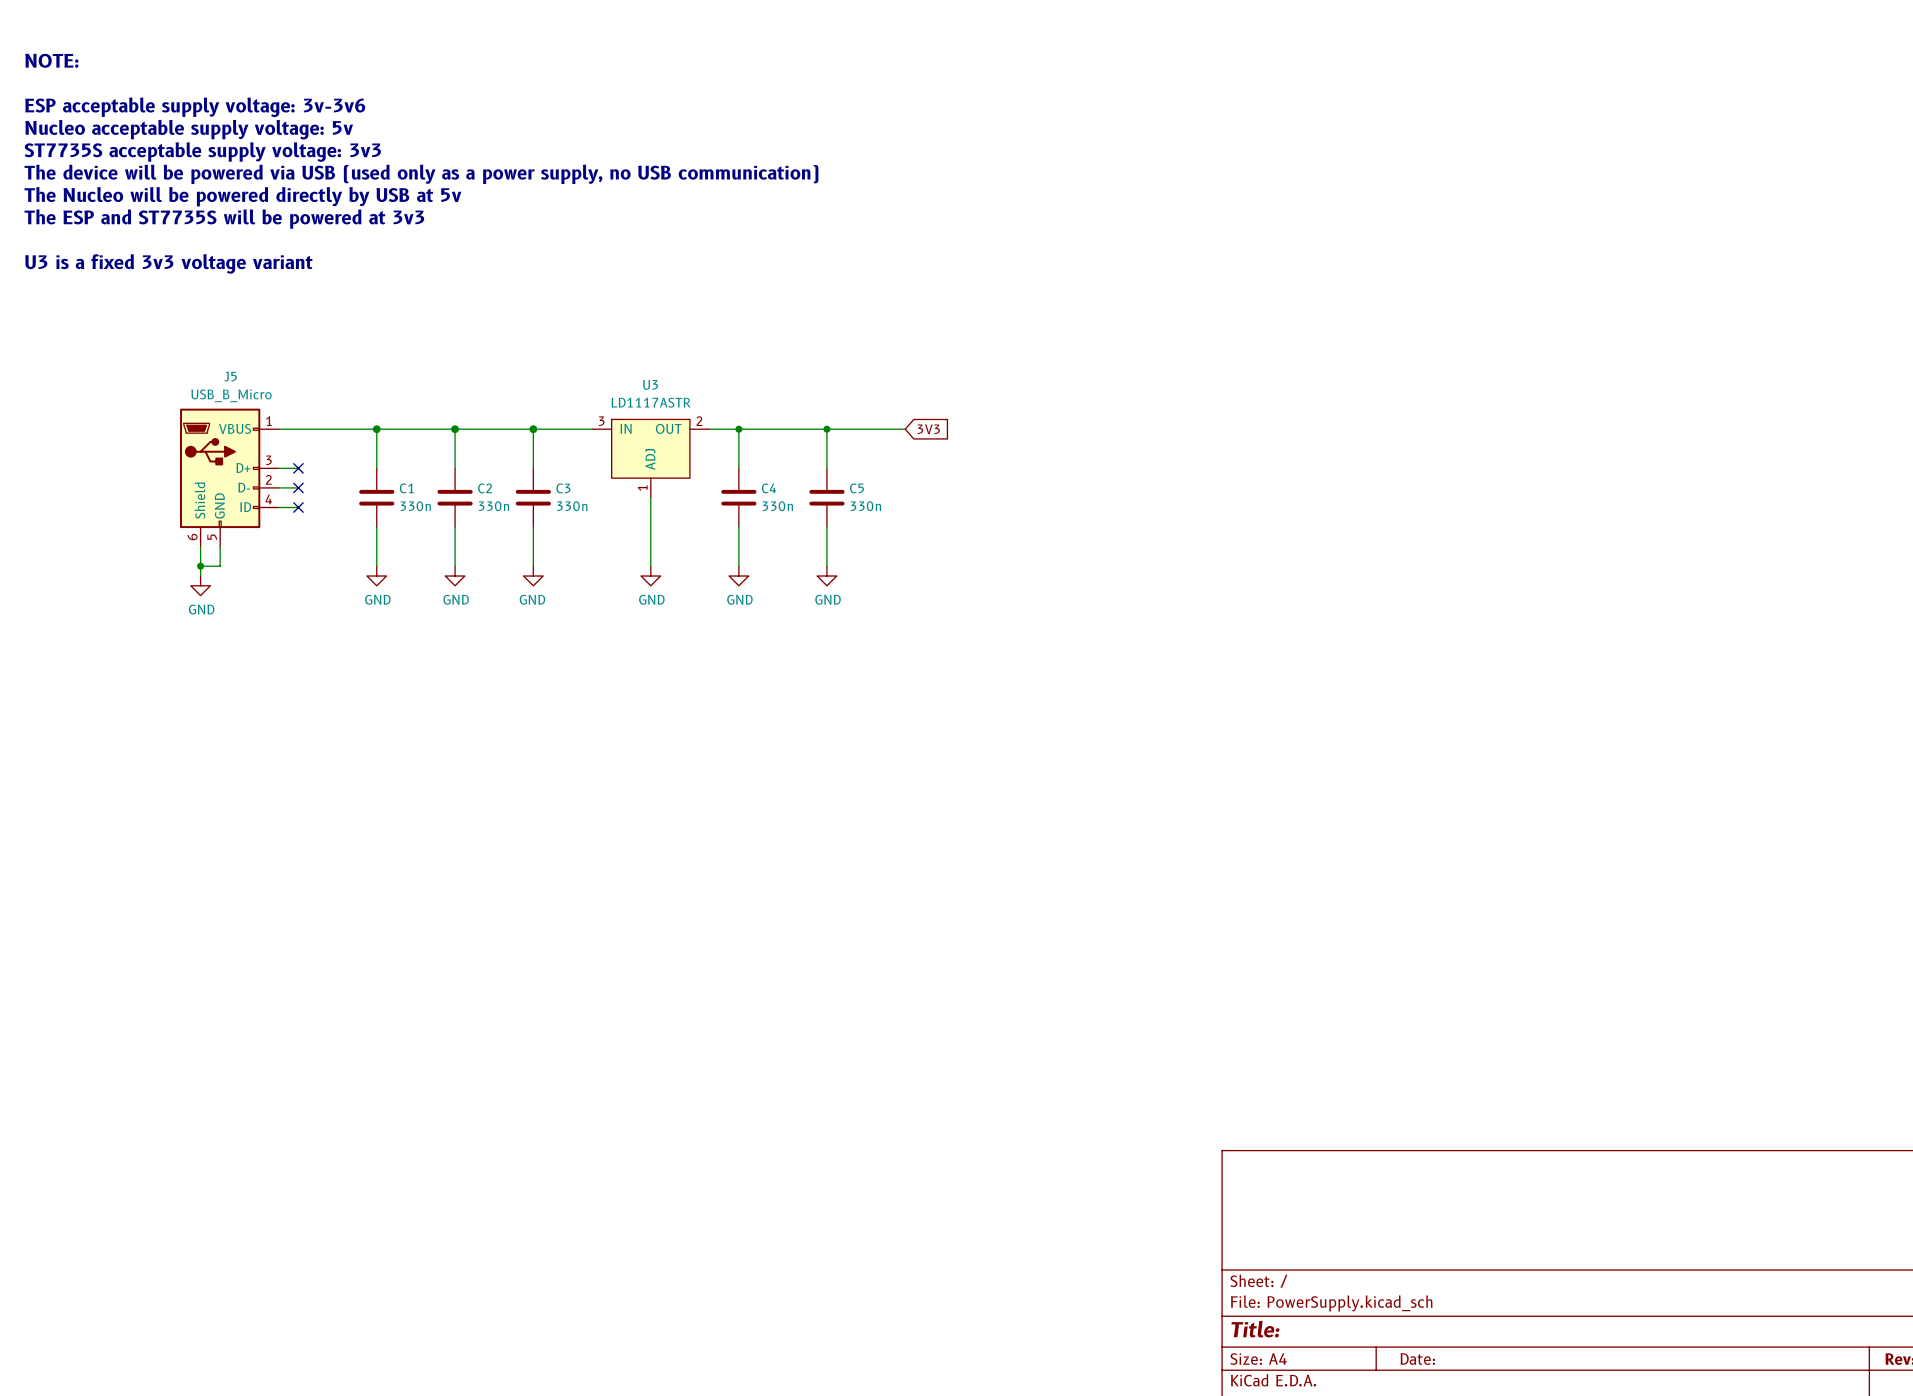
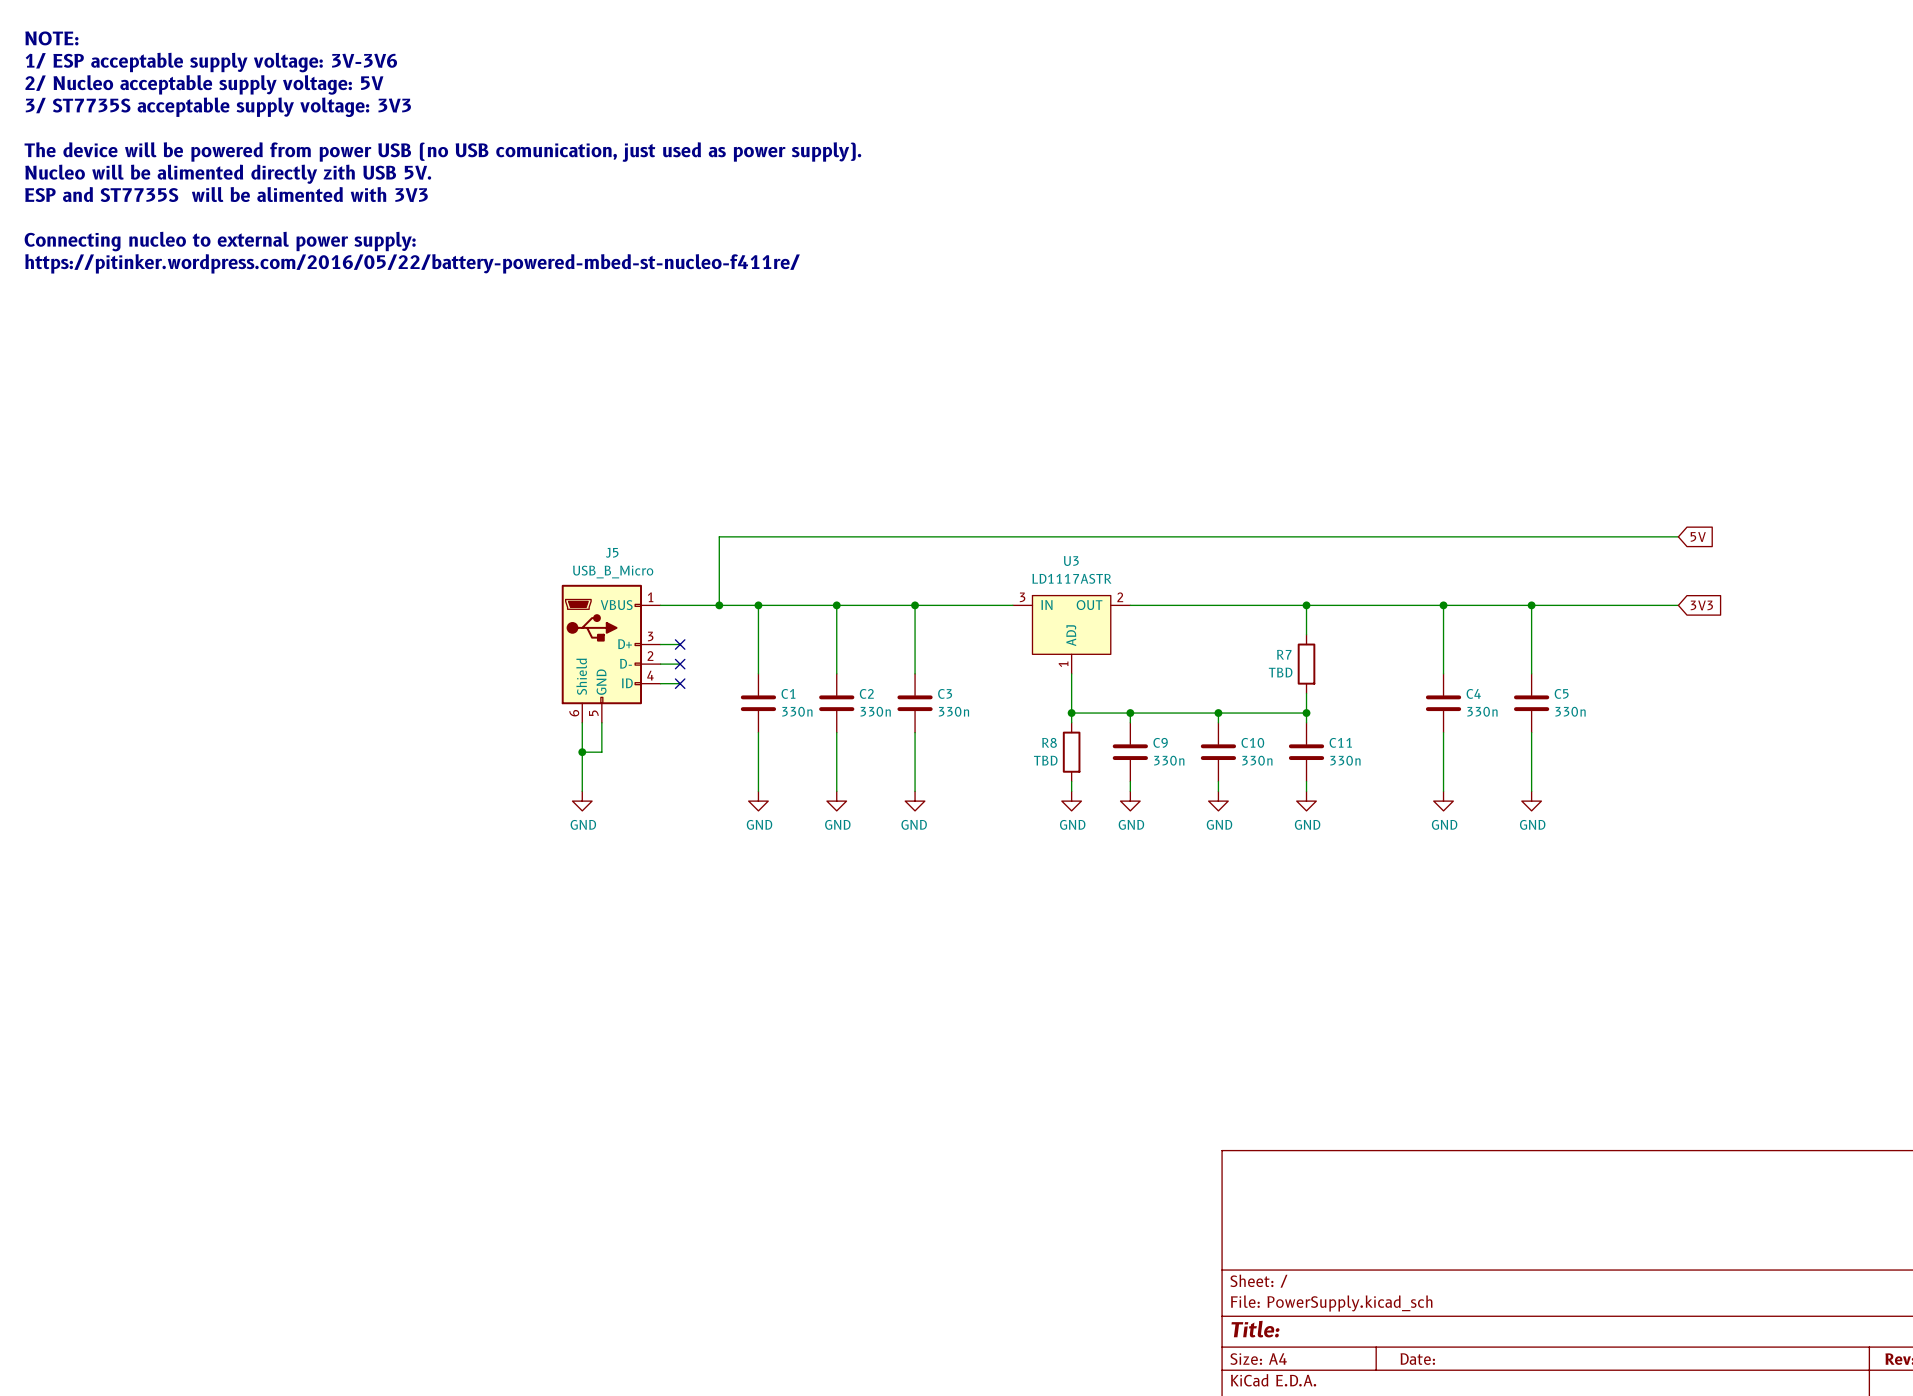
text: none -> NOTE: (51, 38)
text: NOTE: (51, 60) -> 1/ ESP acceptable supply voltage: 3V-3V6 (211, 62)
text: none -> 2/ Nucleo acceptable supply voltage: 5V (204, 84)
text: ESP acceptable supply voltage: 3v-3v6 (195, 107) -> 3/ ST7735S acceptable supply voltage: 3V3 (218, 107)
text: Nucleo acceptable supply voltage: 5v (189, 129) -> none
text: ST7735S acceptable supply voltage: 3v3 (202, 152) -> The device will be powered from power USB (no USB comunication, just used as power supply). (442, 152)
text: The device will be powered via USB (used only as a power supply, no USB communication) (421, 174) -> Nucleo will be alimented directly zith USB 5V. (228, 174)
text: The Nucleo will be powered directly by USB at 5v (242, 196) -> ESP and ST7735S will be alimented with 3V3 (226, 194)
text: The ESP and ST7735S will be powered at 3v3 (224, 219) -> none
text: none -> Connecting nucleo to external power supply: (220, 241)
text: U3 is a fixed 3v3 voltage variant (168, 263) -> https://pitinker.wordpress.com/2016/05/22/battery-powered-mbed-st-nucleo-f411re/ (412, 263)
wire: (278, 429) (592, 429) -> none
wire: (376, 429) (376, 468) -> none
junction: (376, 429) -> none
wire: (455, 429) (455, 468) -> none
junction: (455, 429) -> none
wire: (533, 429) (533, 468) -> none
junction: (533, 429) -> none
wire: (709, 429) (905, 429) -> none
wire: (738, 429) (738, 468) -> none
junction: (738, 429) -> none
wire: (826, 429) (826, 468) -> none
junction: (826, 429) -> none
global label: 3V3 (928, 429) -> none
U3 position: (650, 458) -> (1071, 634)
wire: (278, 468) (298, 468) -> none
no-connect mark: (298, 468) -> none
J5 position: (229, 477) -> (611, 653)
wire: (278, 487) (298, 487) -> none
no-connect mark: (298, 487) -> none
C1 position: (376, 497) -> (758, 703)
C2 position: (455, 497) -> (836, 703)
C3 position: (533, 497) -> (915, 703)
wire: (650, 497) (650, 566) -> (758, 605) (758, 673)
C4 position: (738, 497) -> (1443, 703)
C5 position: (826, 497) -> (1531, 703)
wire: (278, 507) (298, 507) -> none
no-connect mark: (298, 507) -> none
wire: (376, 527) (376, 566) -> none
wire: (455, 527) (455, 566) -> none
wire: (533, 527) (533, 566) -> none
wire: (738, 527) (738, 566) -> none
wire: (826, 527) (826, 566) -> none
wire: none -> (1678, 536) (719, 536) (719, 605)
global label: none -> 5V (1698, 536)
wire: (200, 546) (200, 576) -> none
wire: (220, 546) (220, 566) (200, 566) -> none
junction: (200, 566) -> none
power symbol: GND (376, 576) -> none
power symbol: GND (455, 576) -> none
power symbol: GND (533, 576) -> none
power symbol: GND (650, 576) -> none
power symbol: GND (738, 576) -> none
power symbol: GND (826, 576) -> none
power symbol: GND (200, 585) -> none
wire: none -> (660, 605) (1012, 605)
junction: none -> (719, 605)
junction: none -> (758, 605)
wire: none -> (836, 605) (836, 673)
junction: none -> (836, 605)
wire: none -> (915, 605) (915, 673)
junction: none -> (915, 605)
wire: none -> (1130, 605) (1678, 605)
wire: none -> (1306, 605) (1306, 634)
junction: none -> (1306, 605)
wire: none -> (1443, 605) (1443, 673)
junction: none -> (1443, 605)
wire: none -> (1531, 605) (1531, 673)
junction: none -> (1531, 605)
global label: none -> 3V3 (1701, 605)
wire: none -> (660, 644) (680, 644)
no-connect mark: none -> (680, 644)
wire: none -> (660, 664) (680, 664)
no-connect mark: none -> (680, 664)
R7: none -> TBD (1306, 664)
wire: none -> (1071, 673) (1071, 722)
wire: none -> (660, 683) (680, 683)
no-connect mark: none -> (680, 683)
wire: none -> (1306, 693) (1306, 722)
wire: none -> (1071, 713) (1306, 713)
junction: none -> (1071, 713)
wire: none -> (1130, 713) (1130, 722)
junction: none -> (1130, 713)
wire: none -> (1218, 713) (1218, 722)
junction: none -> (1218, 713)
junction: none -> (1306, 713)
wire: none -> (582, 722) (582, 791)
wire: none -> (601, 722) (601, 752) (582, 752)
wire: none -> (758, 732) (758, 791)
wire: none -> (836, 732) (836, 791)
wire: none -> (915, 732) (915, 791)
wire: none -> (1443, 732) (1443, 791)
wire: none -> (1531, 732) (1531, 791)
junction: none -> (582, 752)
R8: none -> TBD (1071, 752)
C9: none -> 330n (1130, 752)
C10: none -> 330n (1218, 752)
C11: none -> 330n (1306, 752)
wire: none -> (1071, 781) (1071, 791)
wire: none -> (1130, 781) (1130, 791)
wire: none -> (1218, 781) (1218, 791)
wire: none -> (1306, 781) (1306, 791)
power symbol: none -> GND (582, 801)
power symbol: none -> GND (758, 801)
power symbol: none -> GND (836, 801)
power symbol: none -> GND (915, 801)
power symbol: none -> GND (1071, 801)
power symbol: none -> GND (1130, 801)
power symbol: none -> GND (1218, 801)
power symbol: none -> GND (1306, 801)
power symbol: none -> GND (1443, 801)
power symbol: none -> GND (1531, 801)

